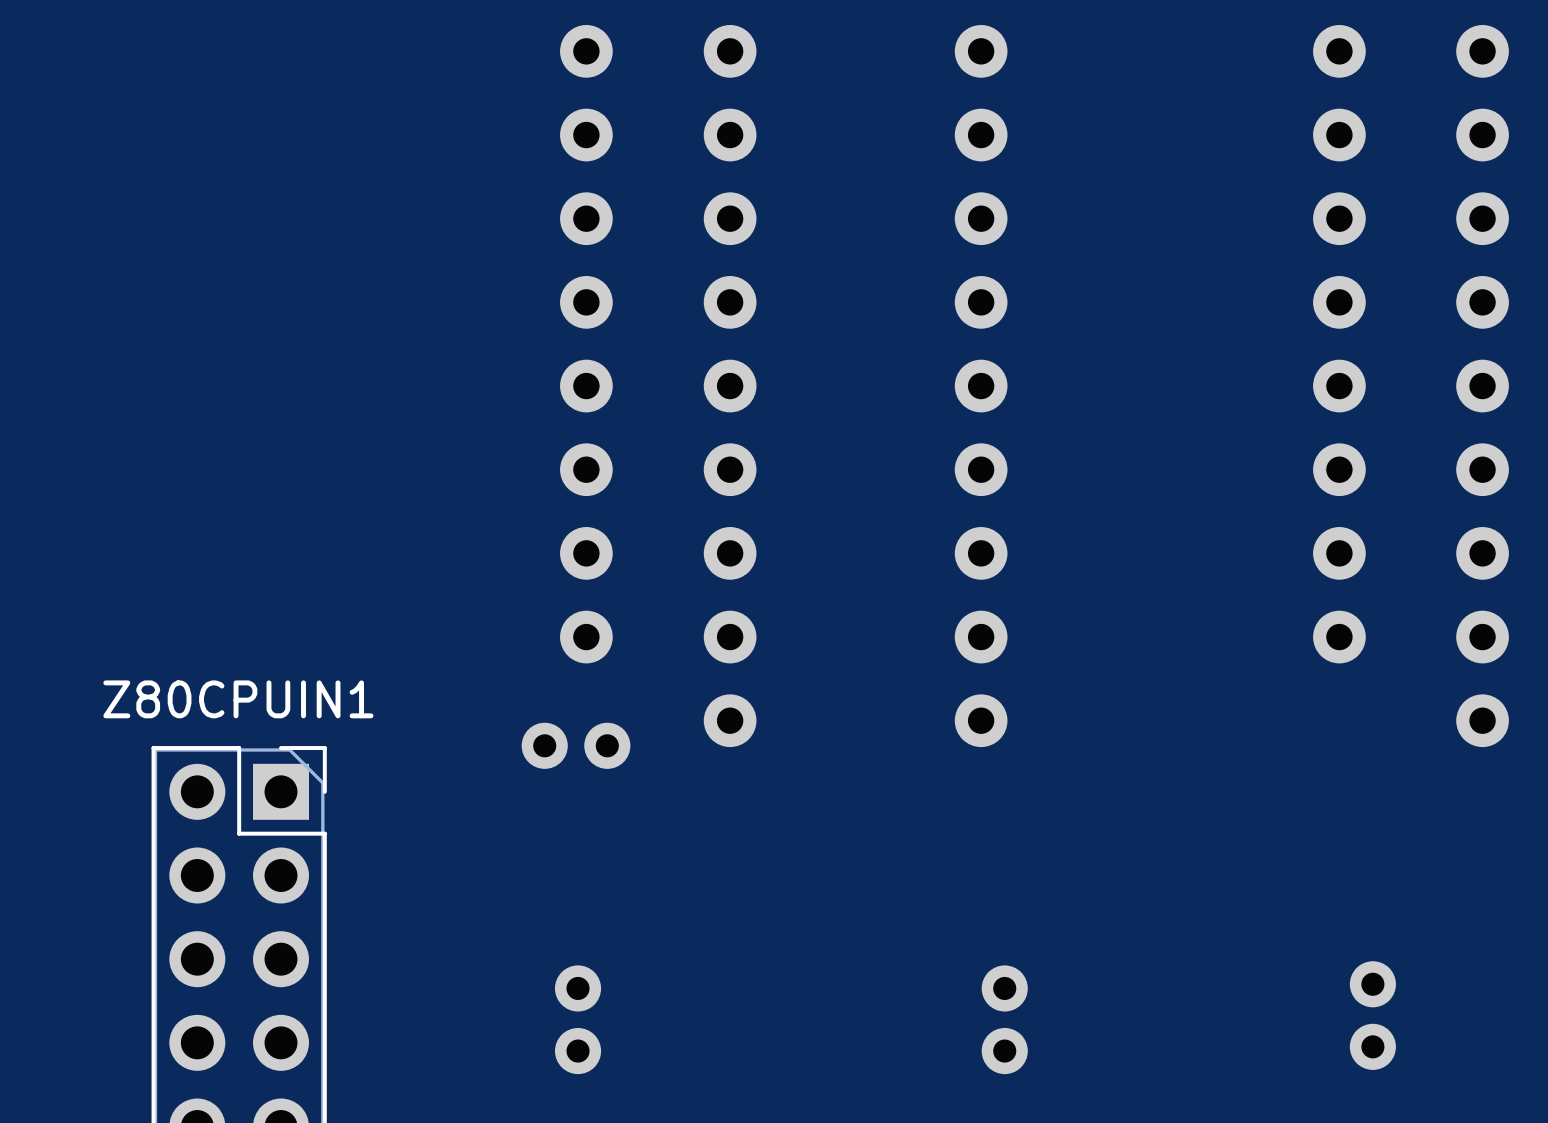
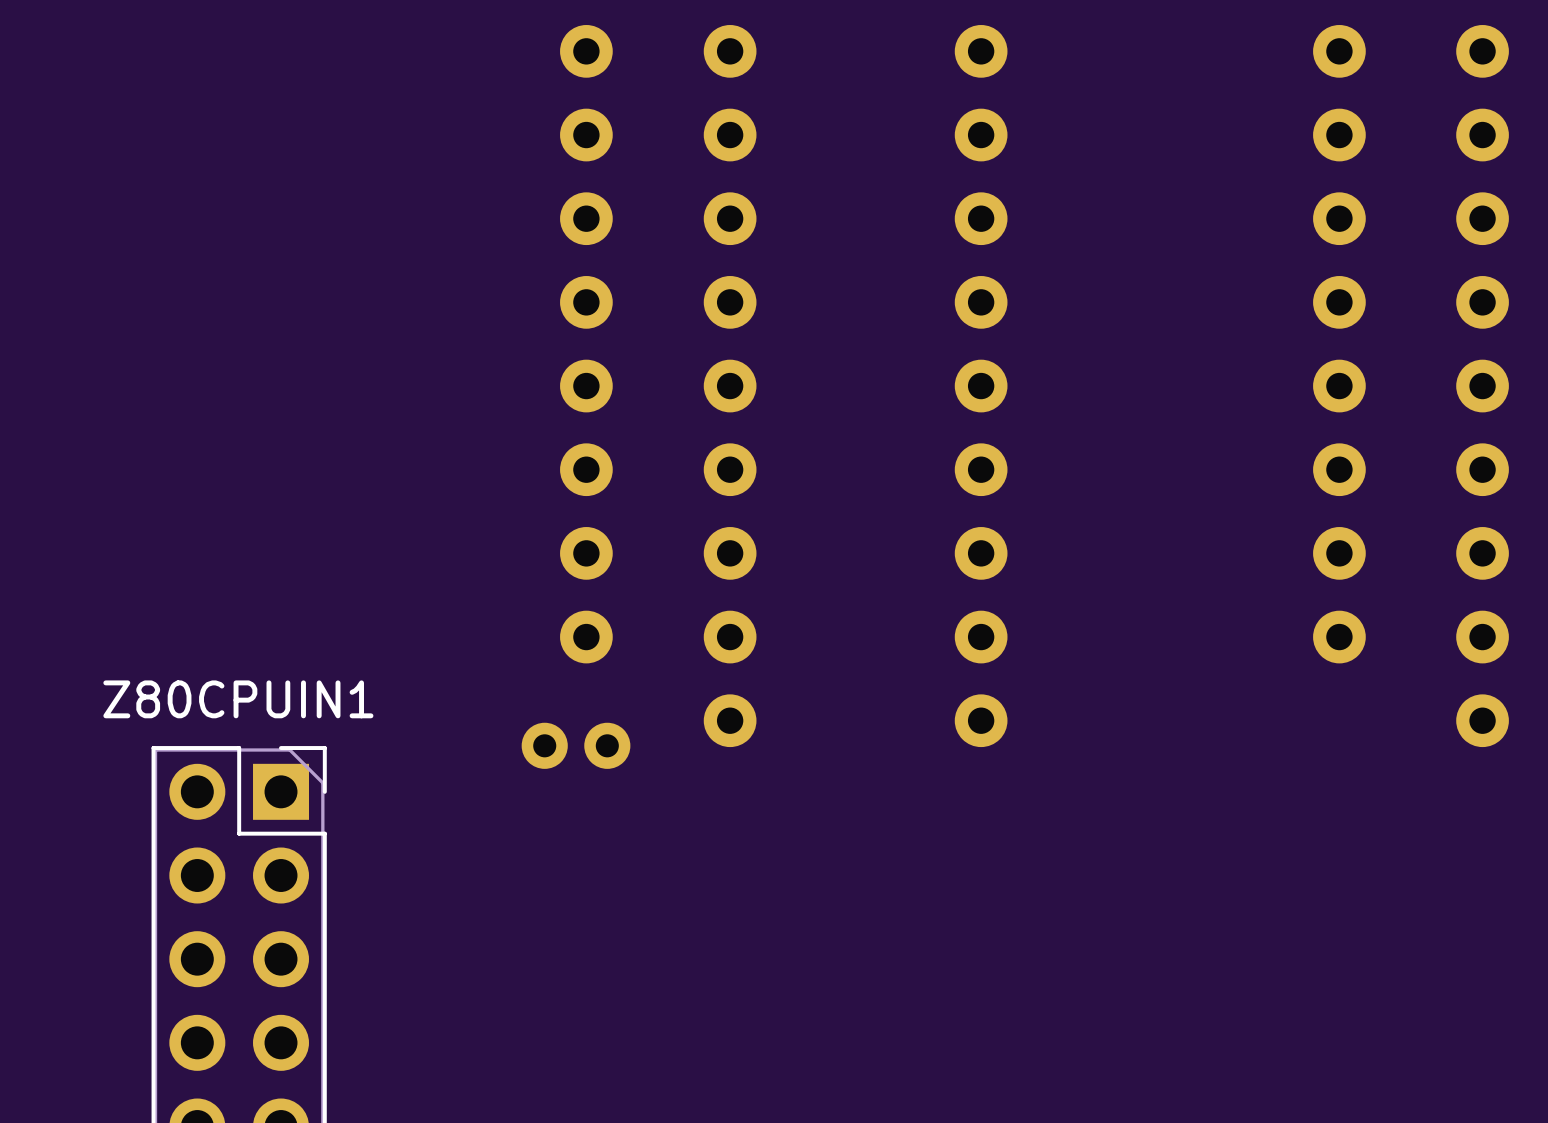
part: (1372, 1015) -> none
part: (578, 1019) -> none
part: (1004, 1019) -> none

